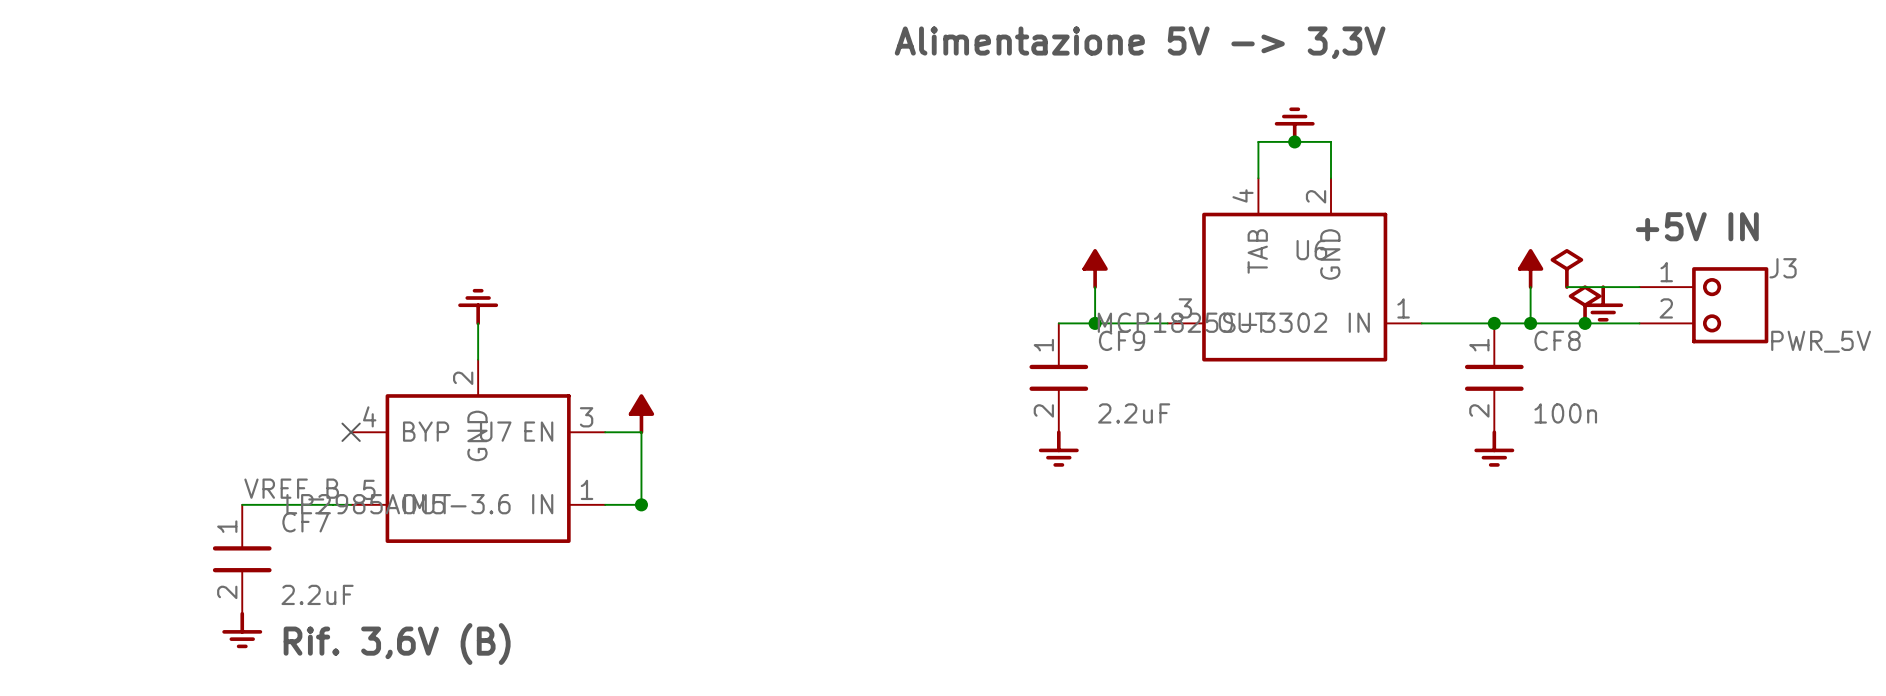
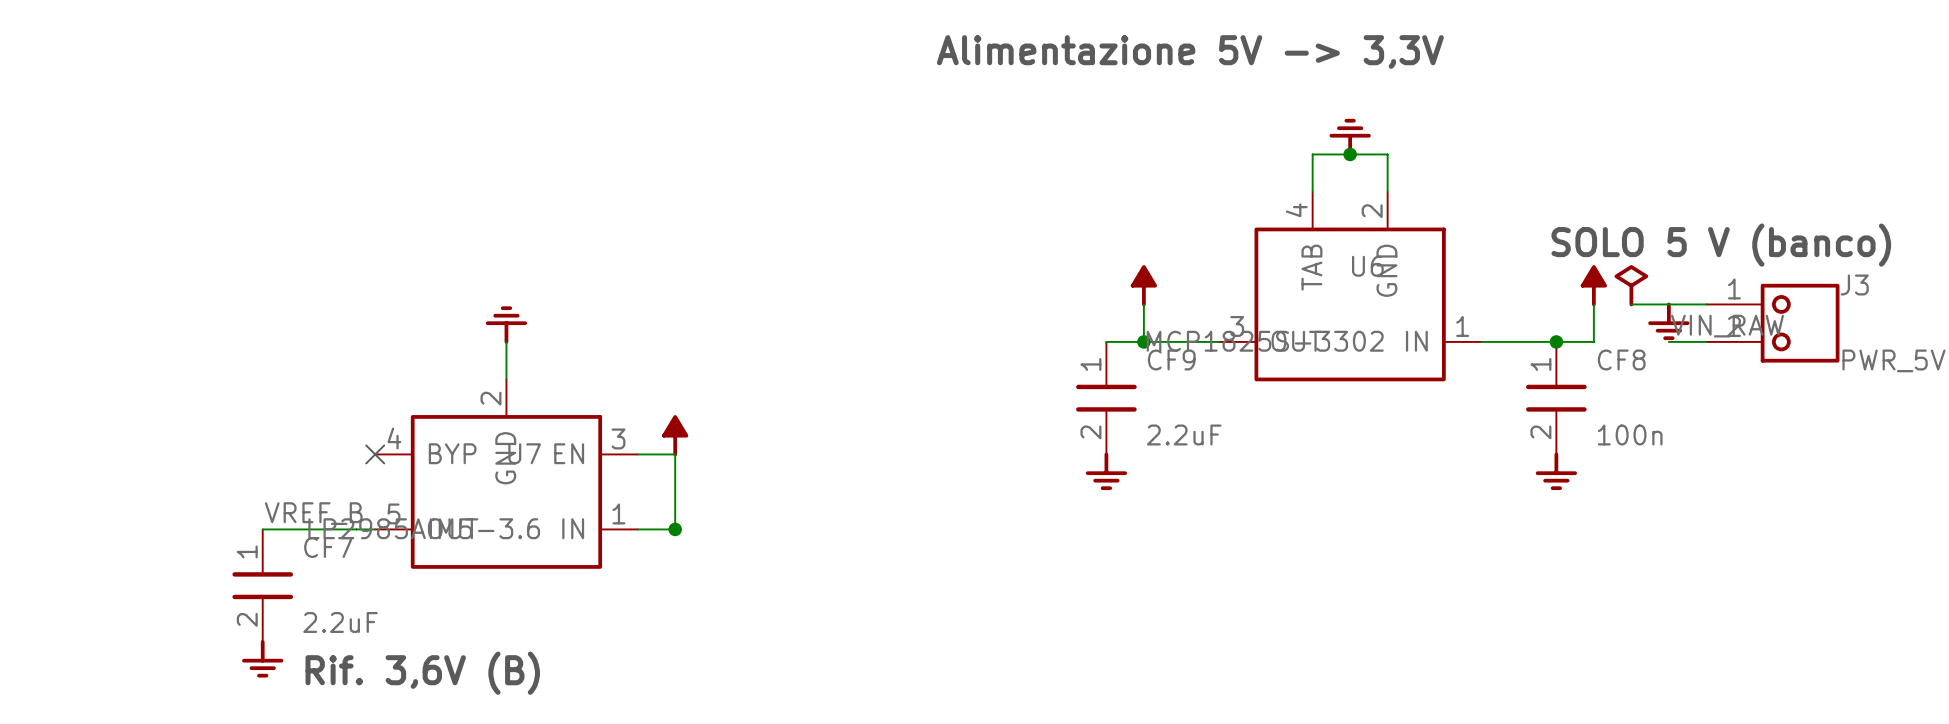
text: +5V IN (1697, 226) -> none
text: none -> SOLO 5 V (banco) (1721, 245)
power symbol: (1585, 305) -> none
label: none -> VIN_RAW (1727, 326)
wire: (1530, 323) (1603, 323) -> none
junction: (1530, 323) -> none
junction: (1585, 323) -> none

